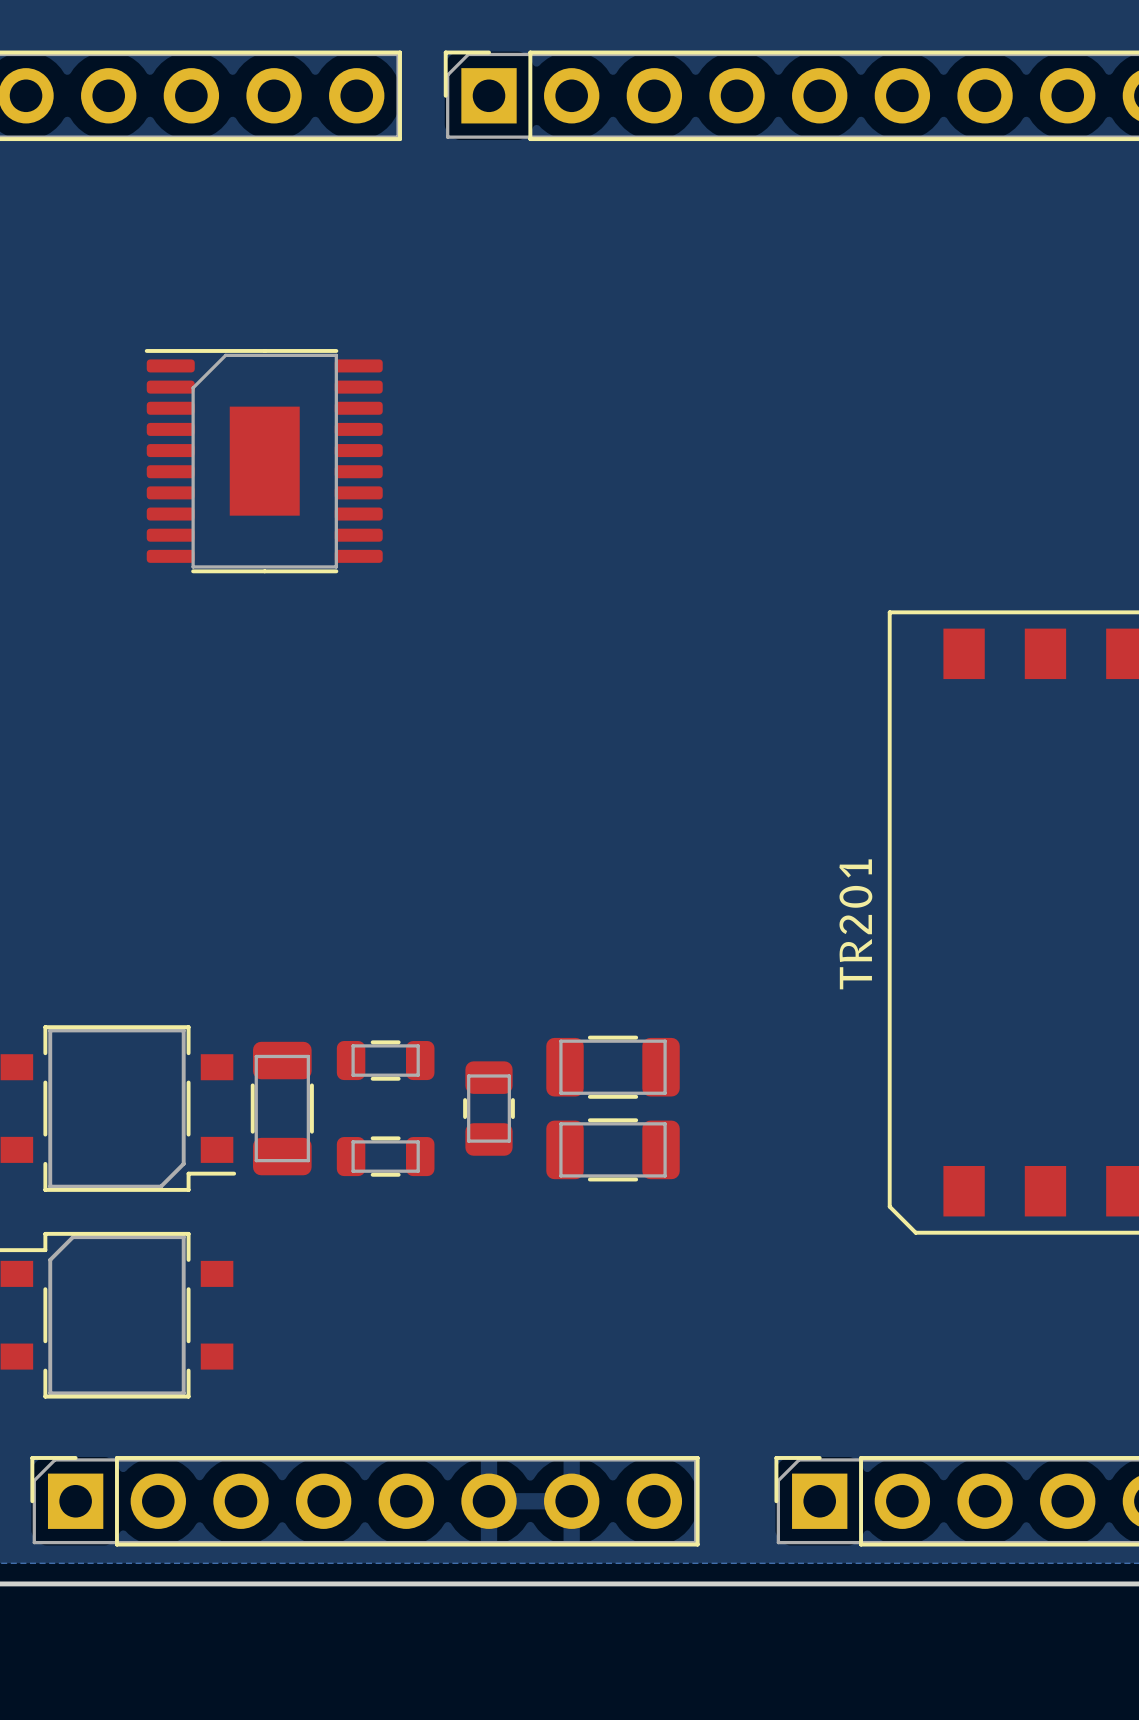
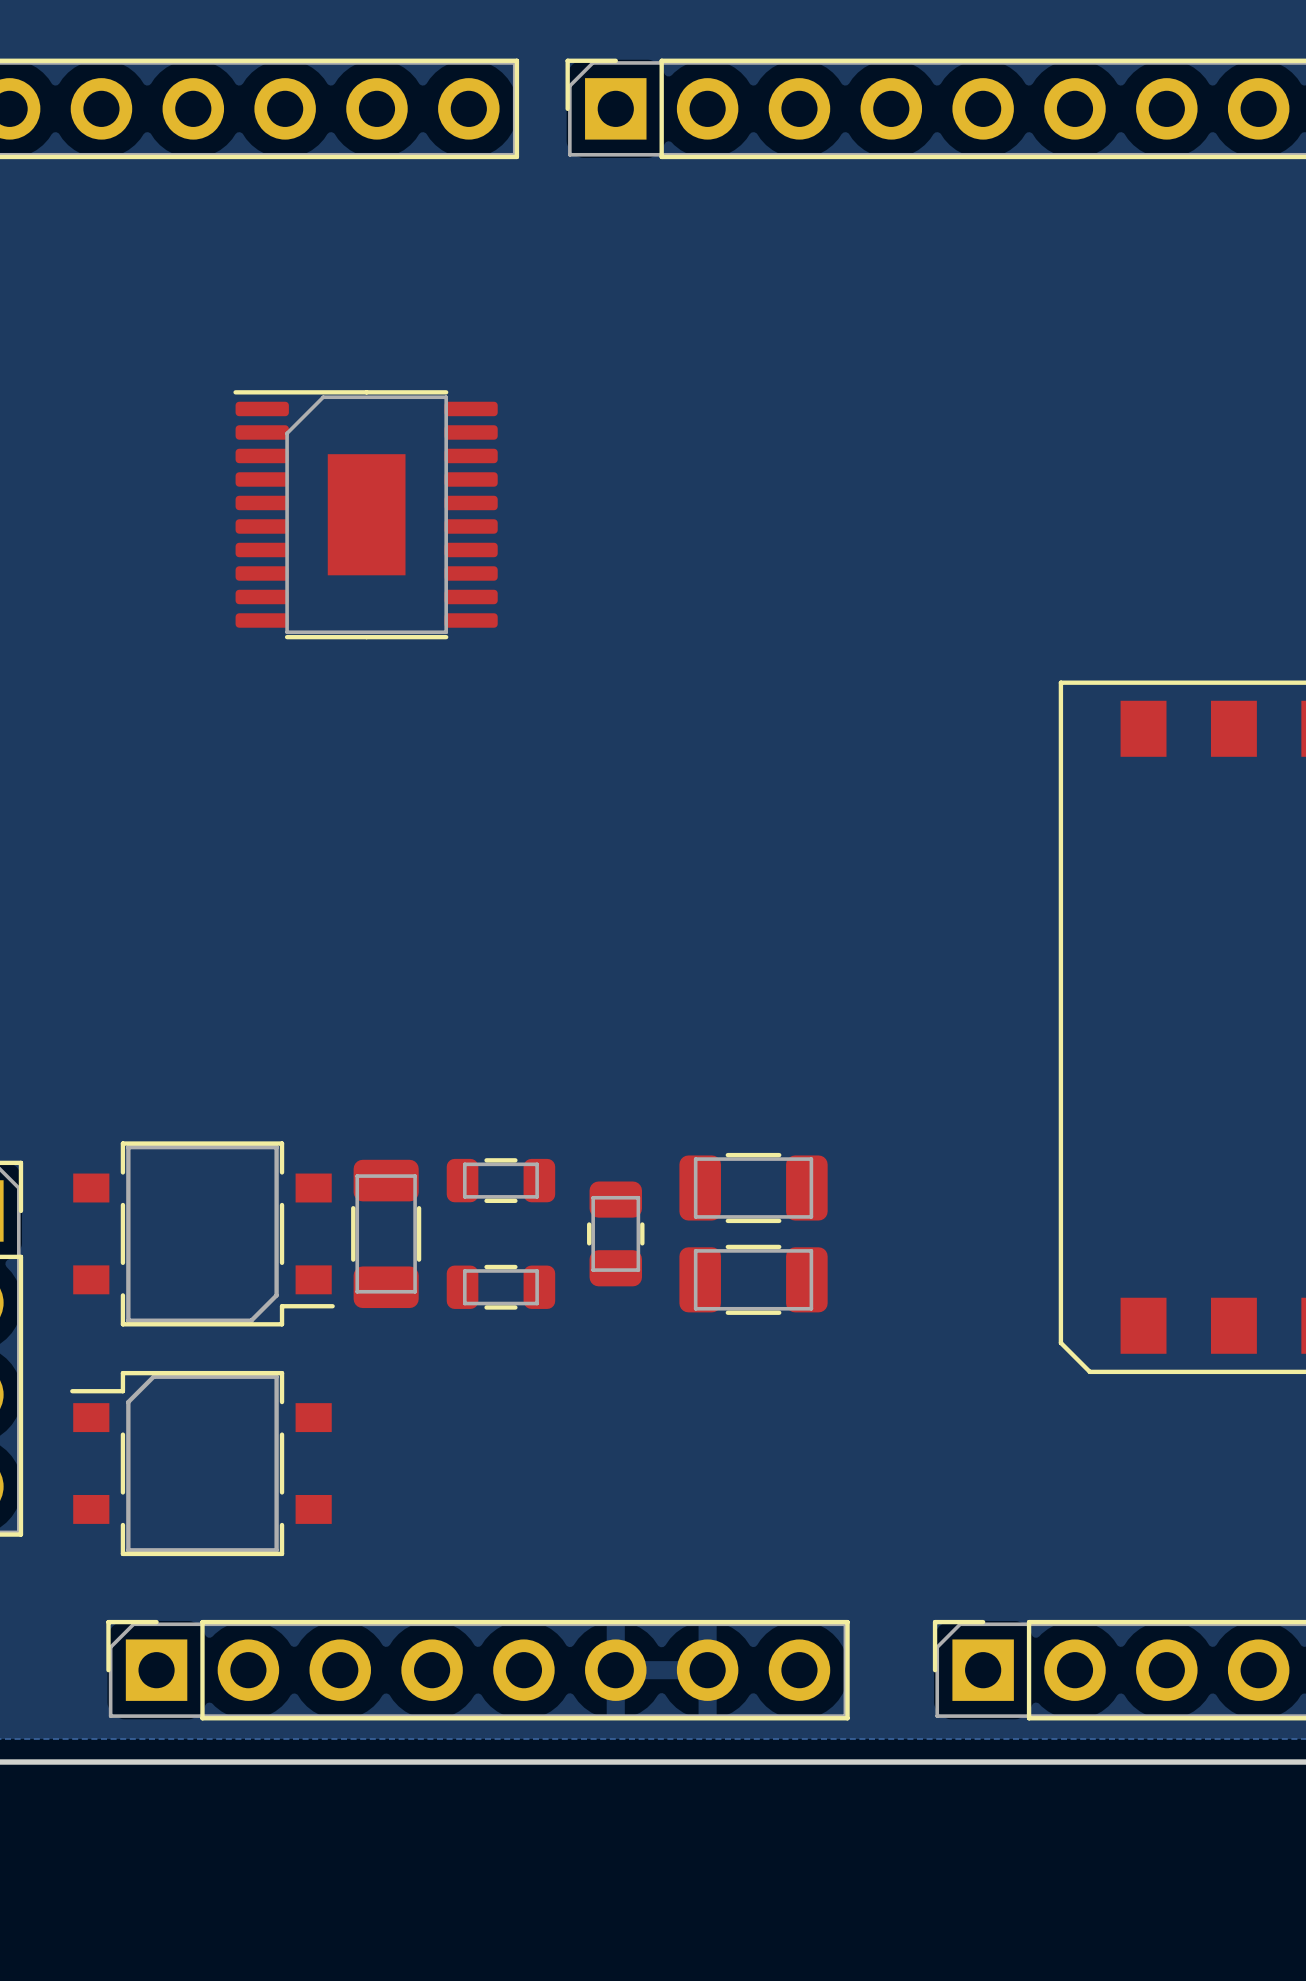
TR201 name: TR201 (855, 924) -> none

